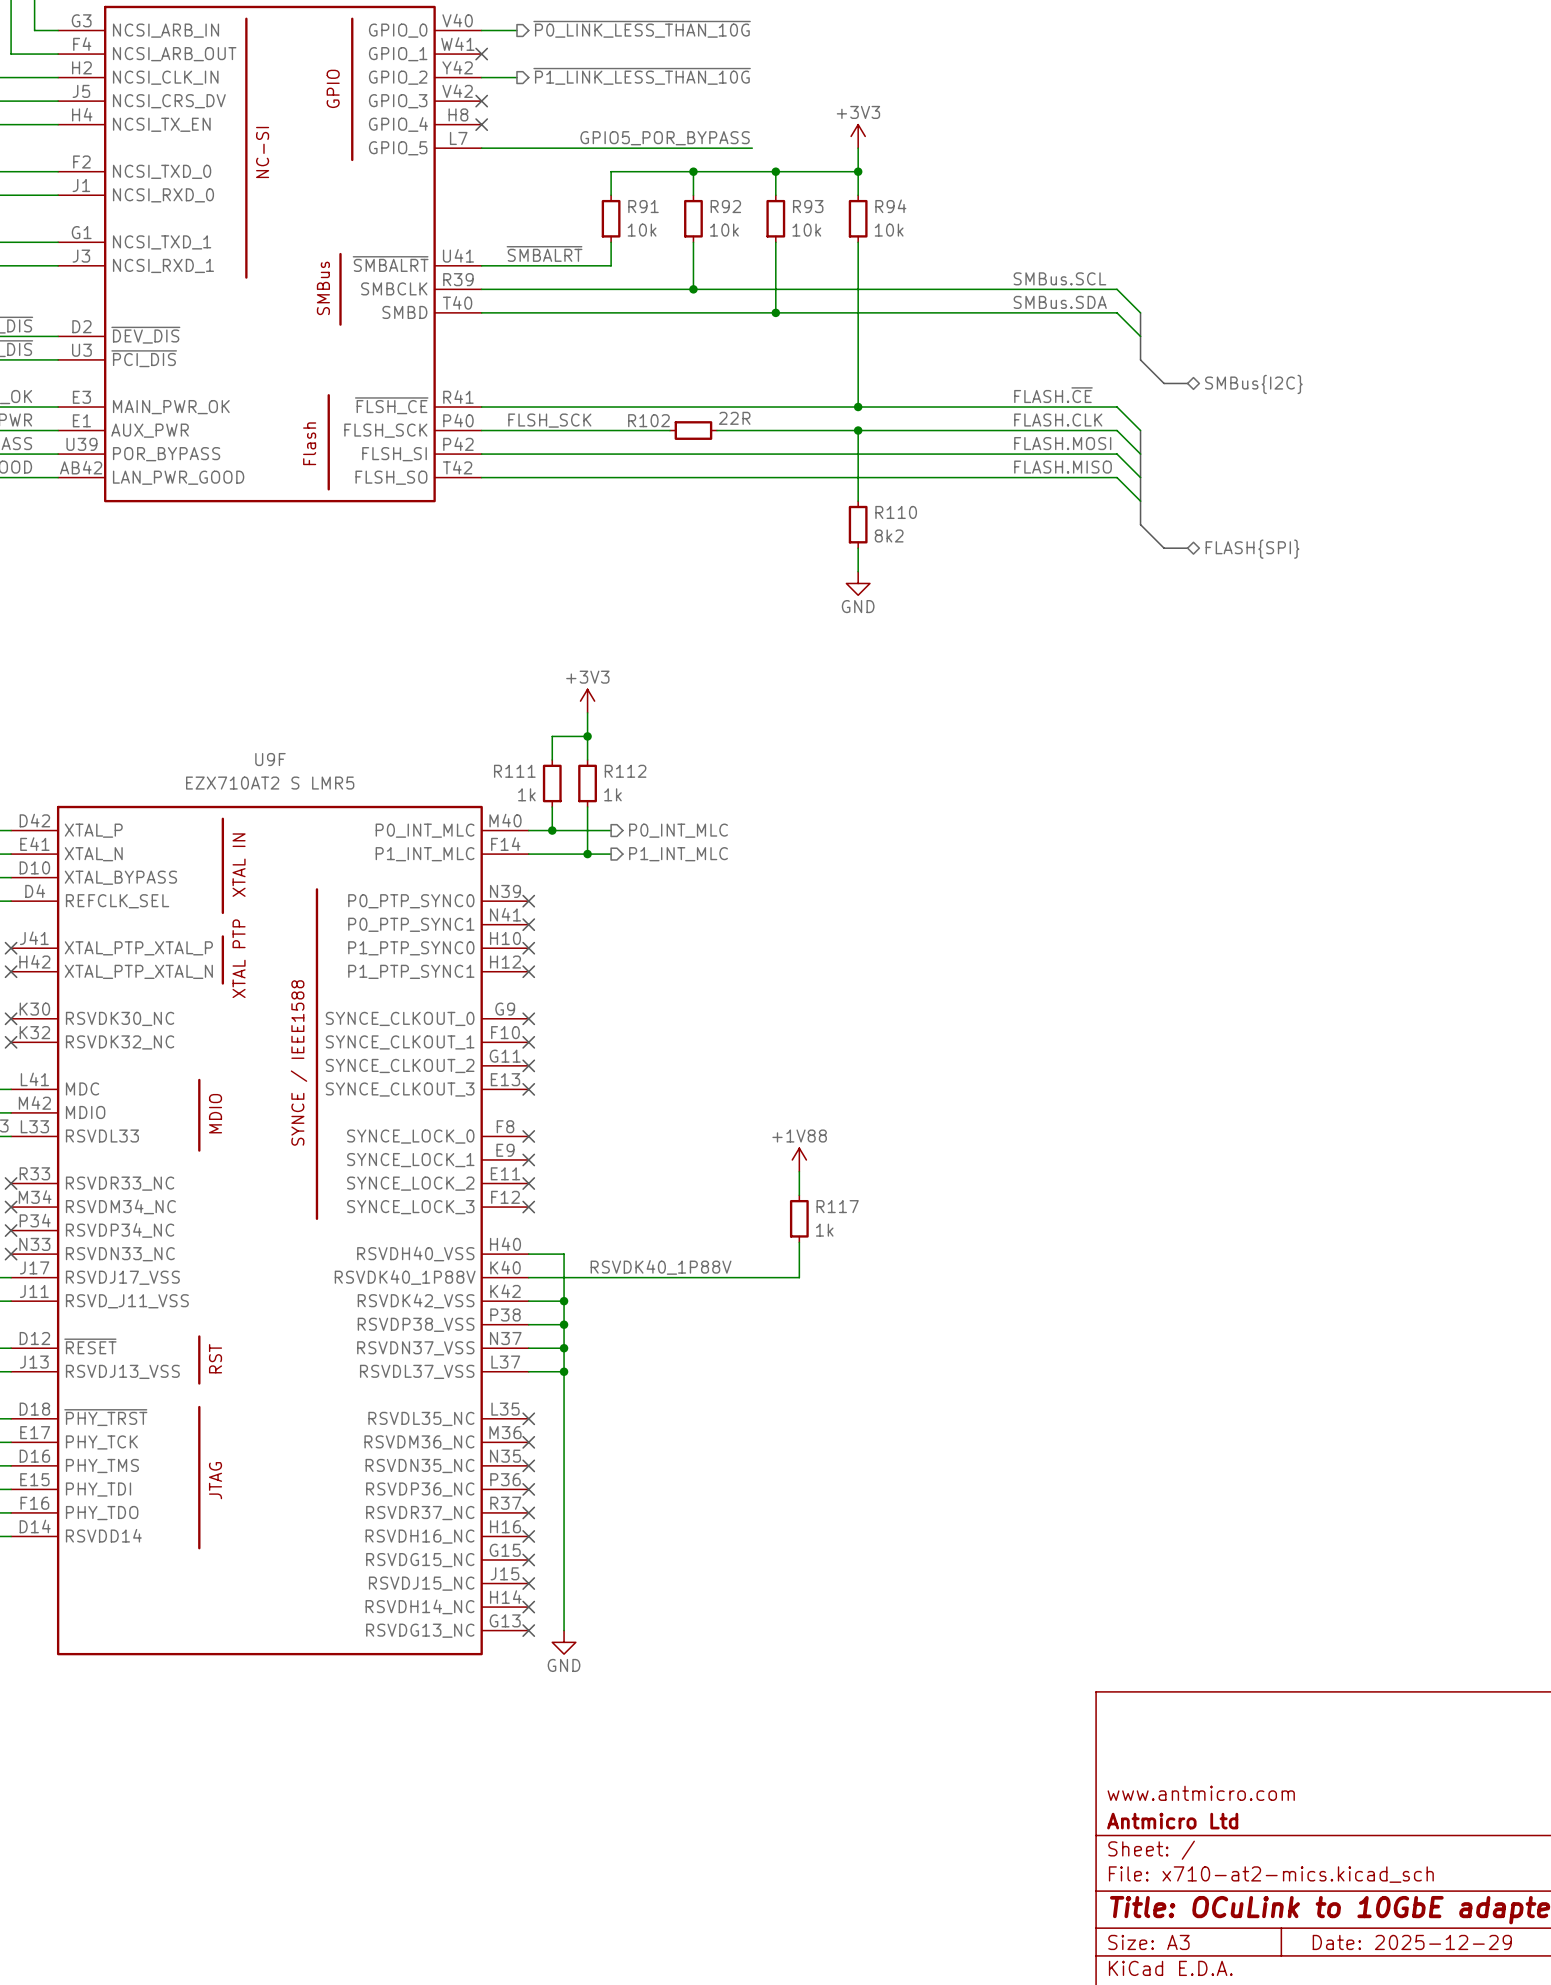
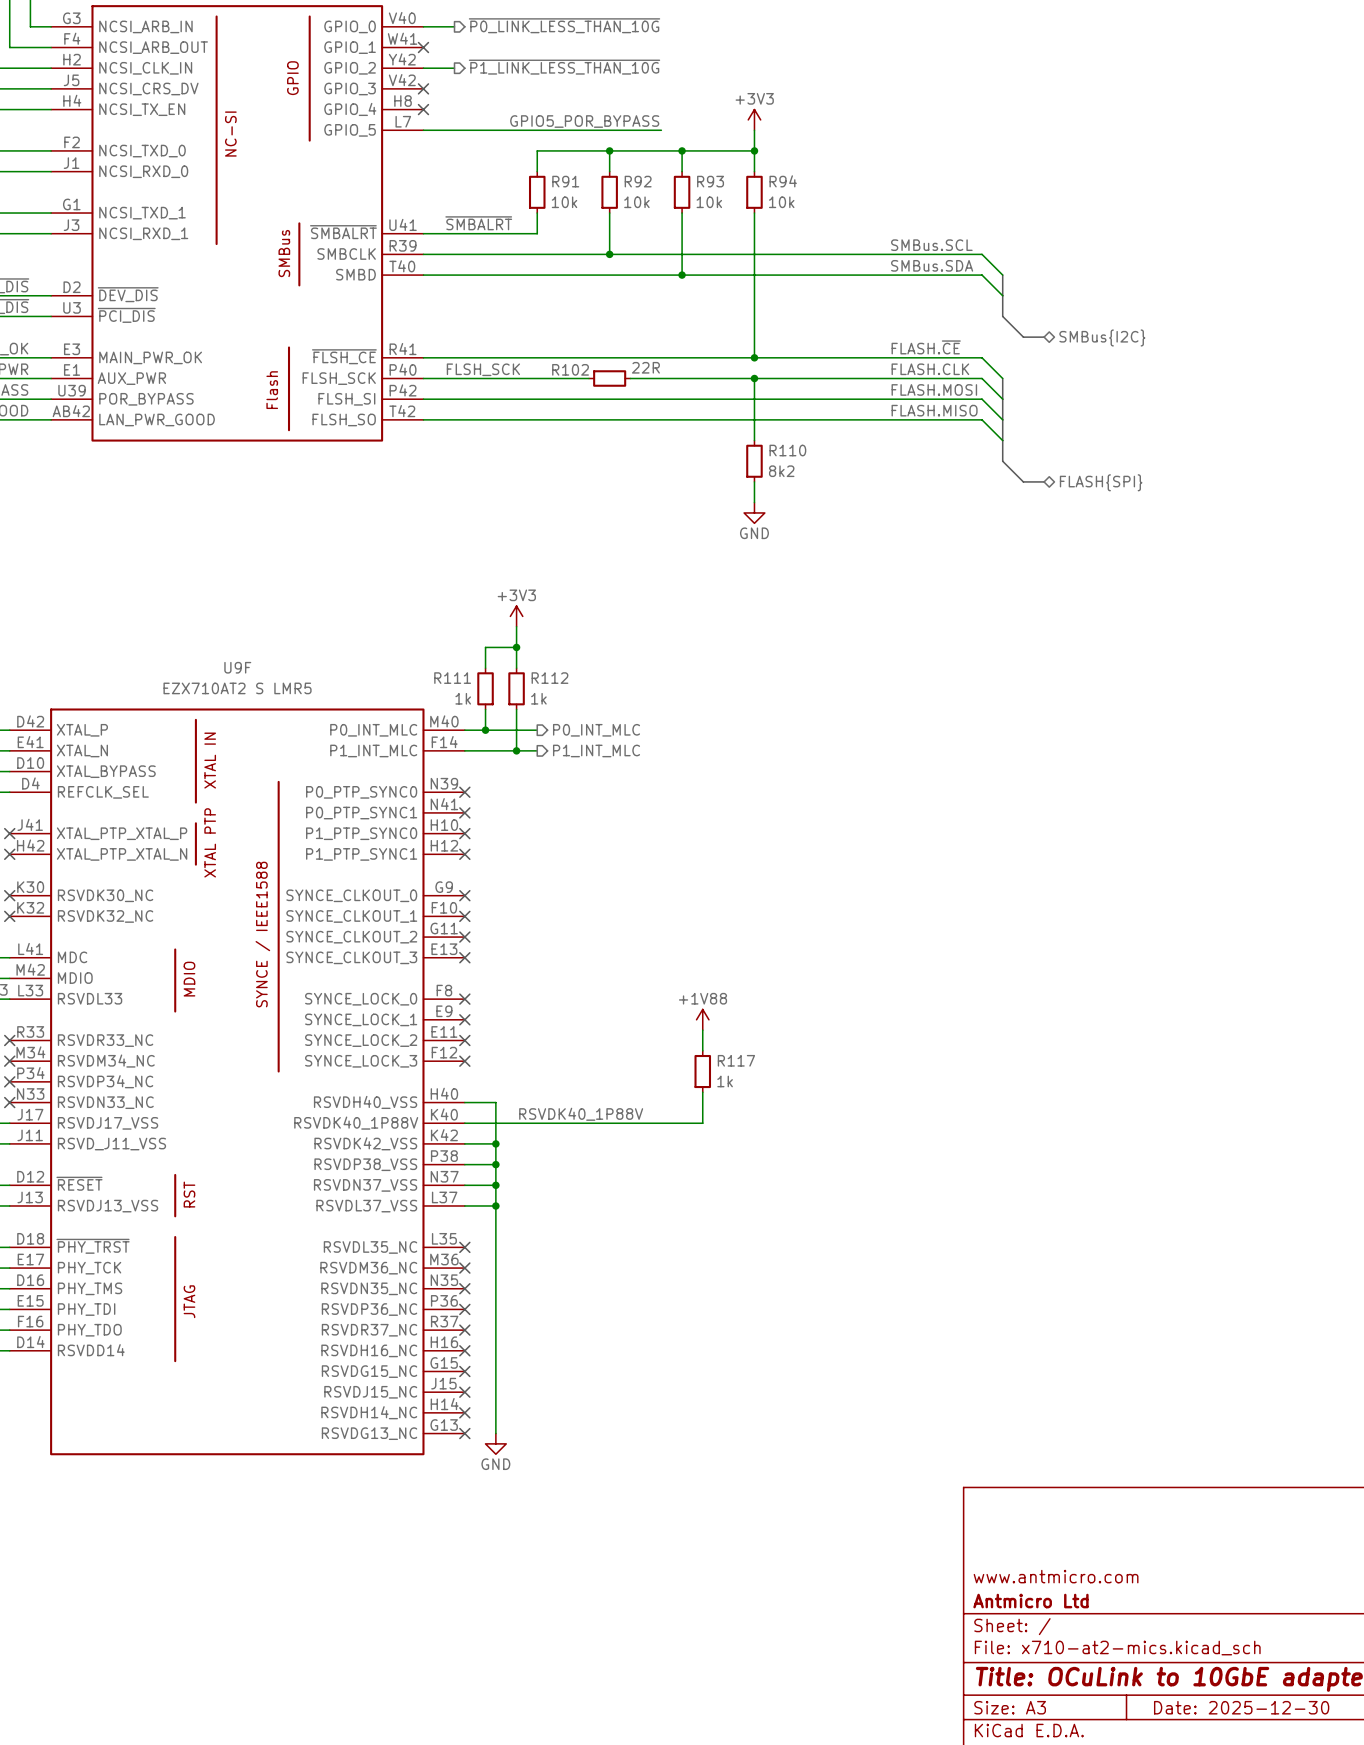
title block: Date: 2025-12-29 (1412, 1942) -> Date: 2025-12-30 (1241, 1707)

